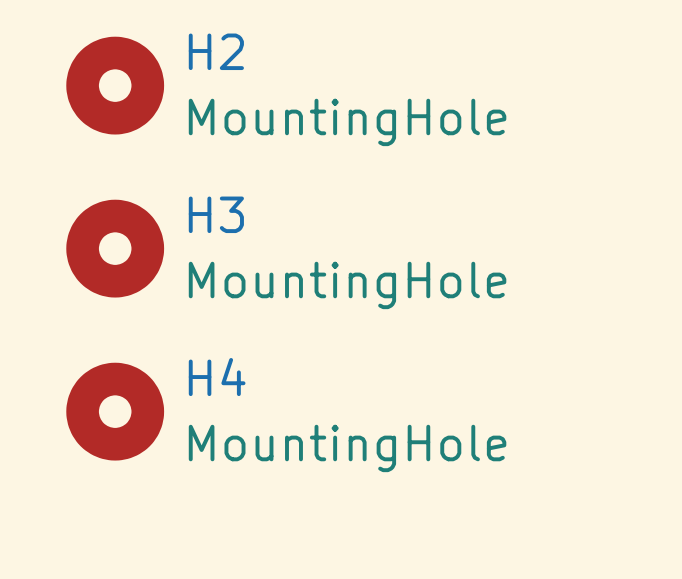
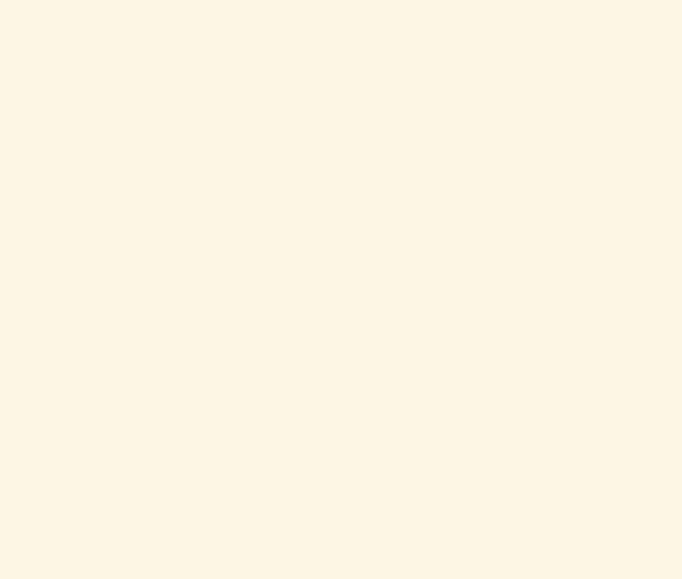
H2: MountingHole (115, 85) -> none
H3: MountingHole (115, 248) -> none
H4: MountingHole (115, 411) -> none

